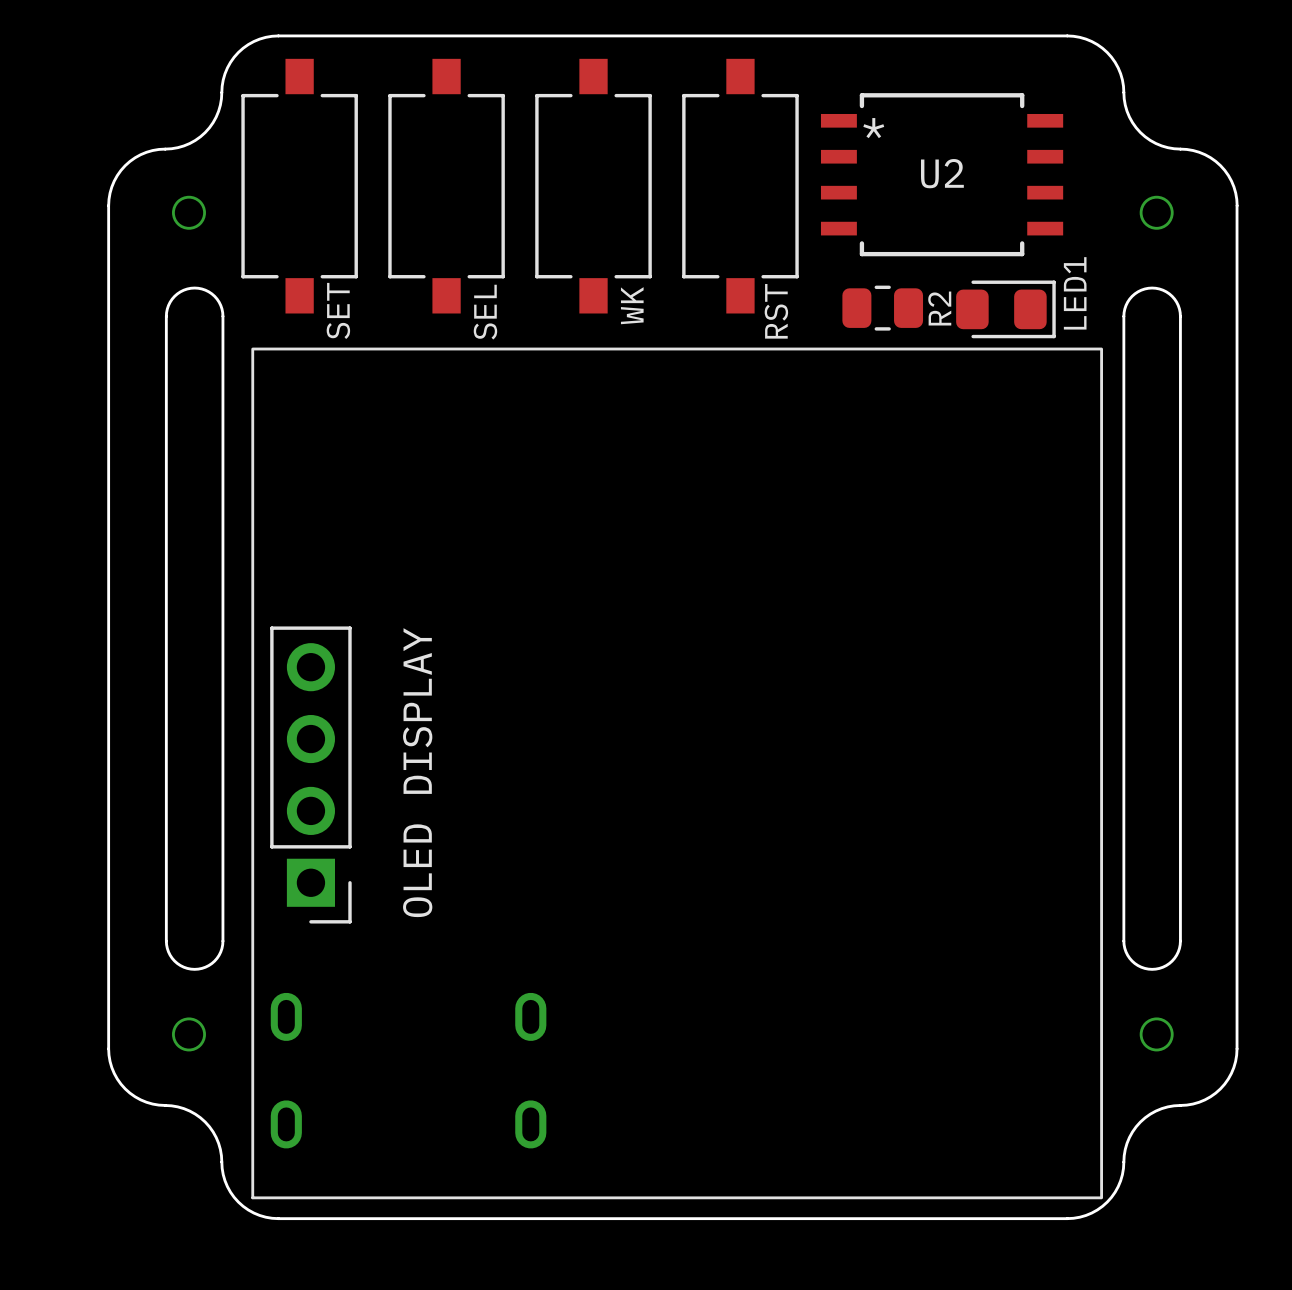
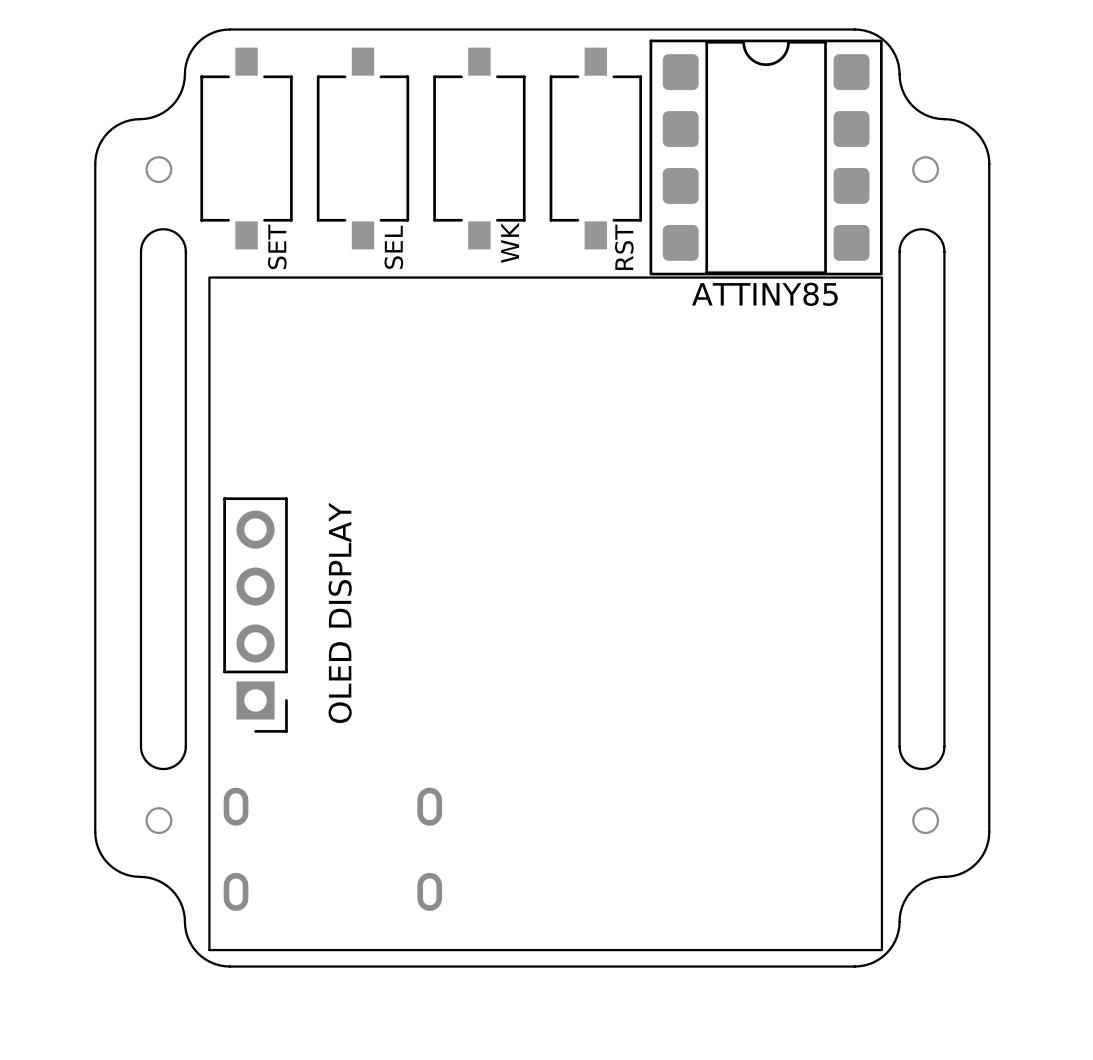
U2: (942, 174) -> none
part: none -> ATTINY85 (766, 157)
R2: (882, 308) -> none
LED1: (1005, 309) -> none

